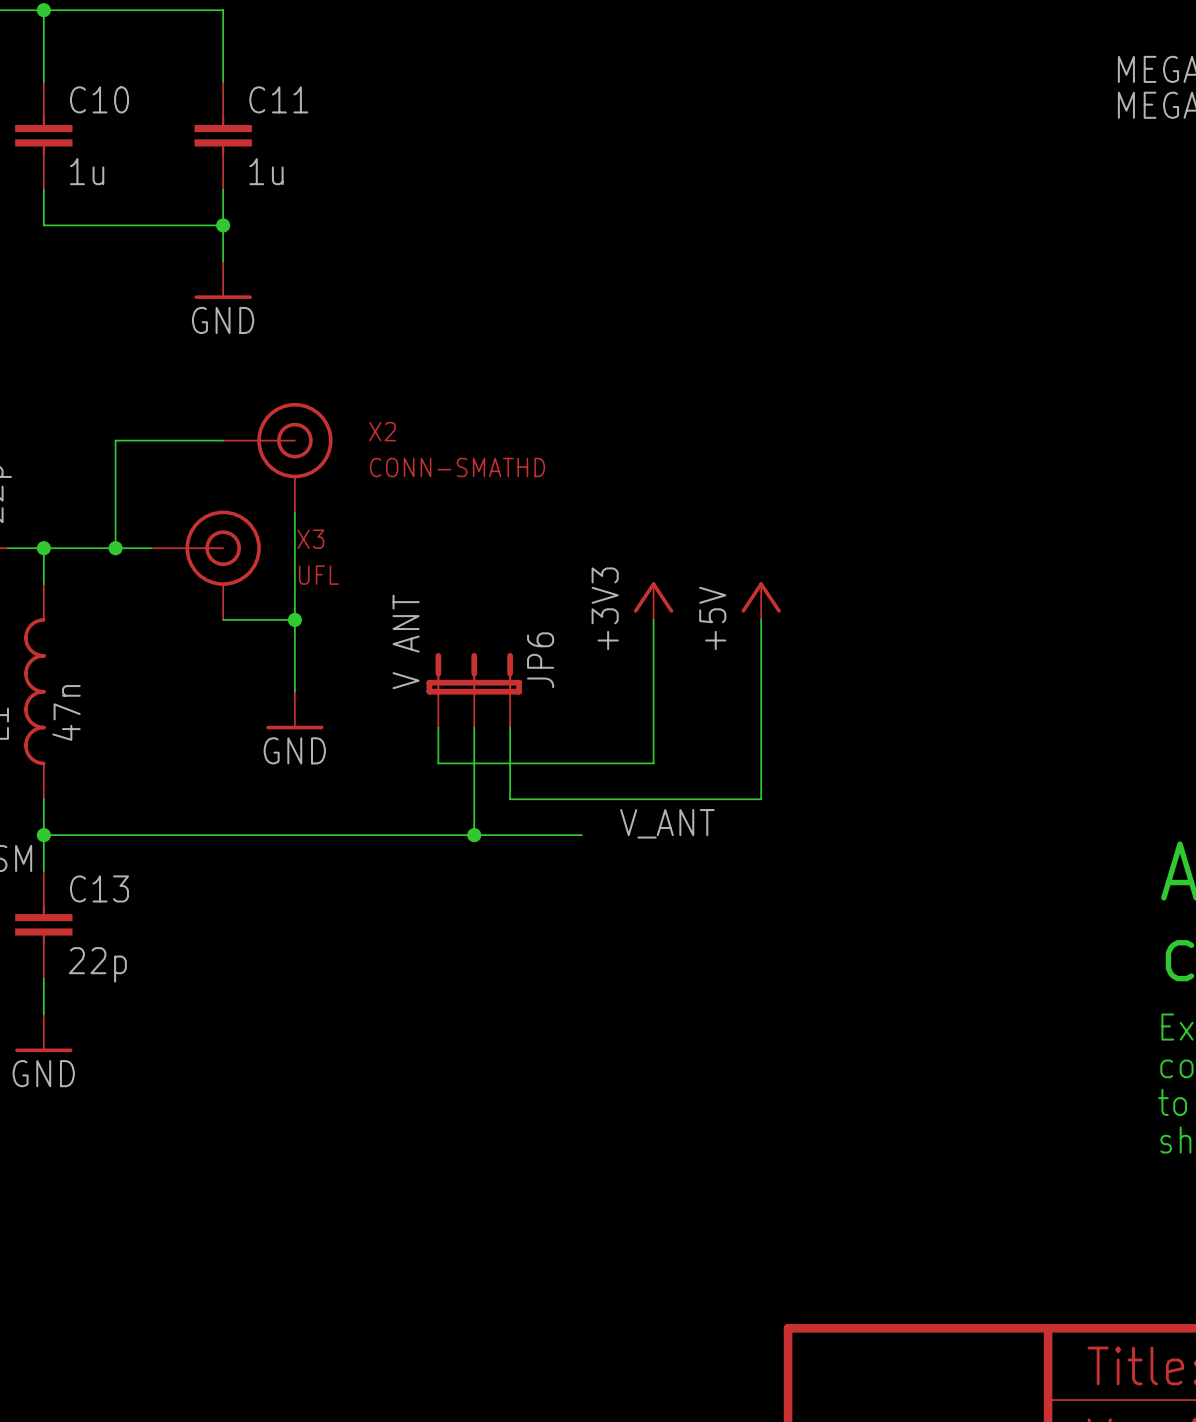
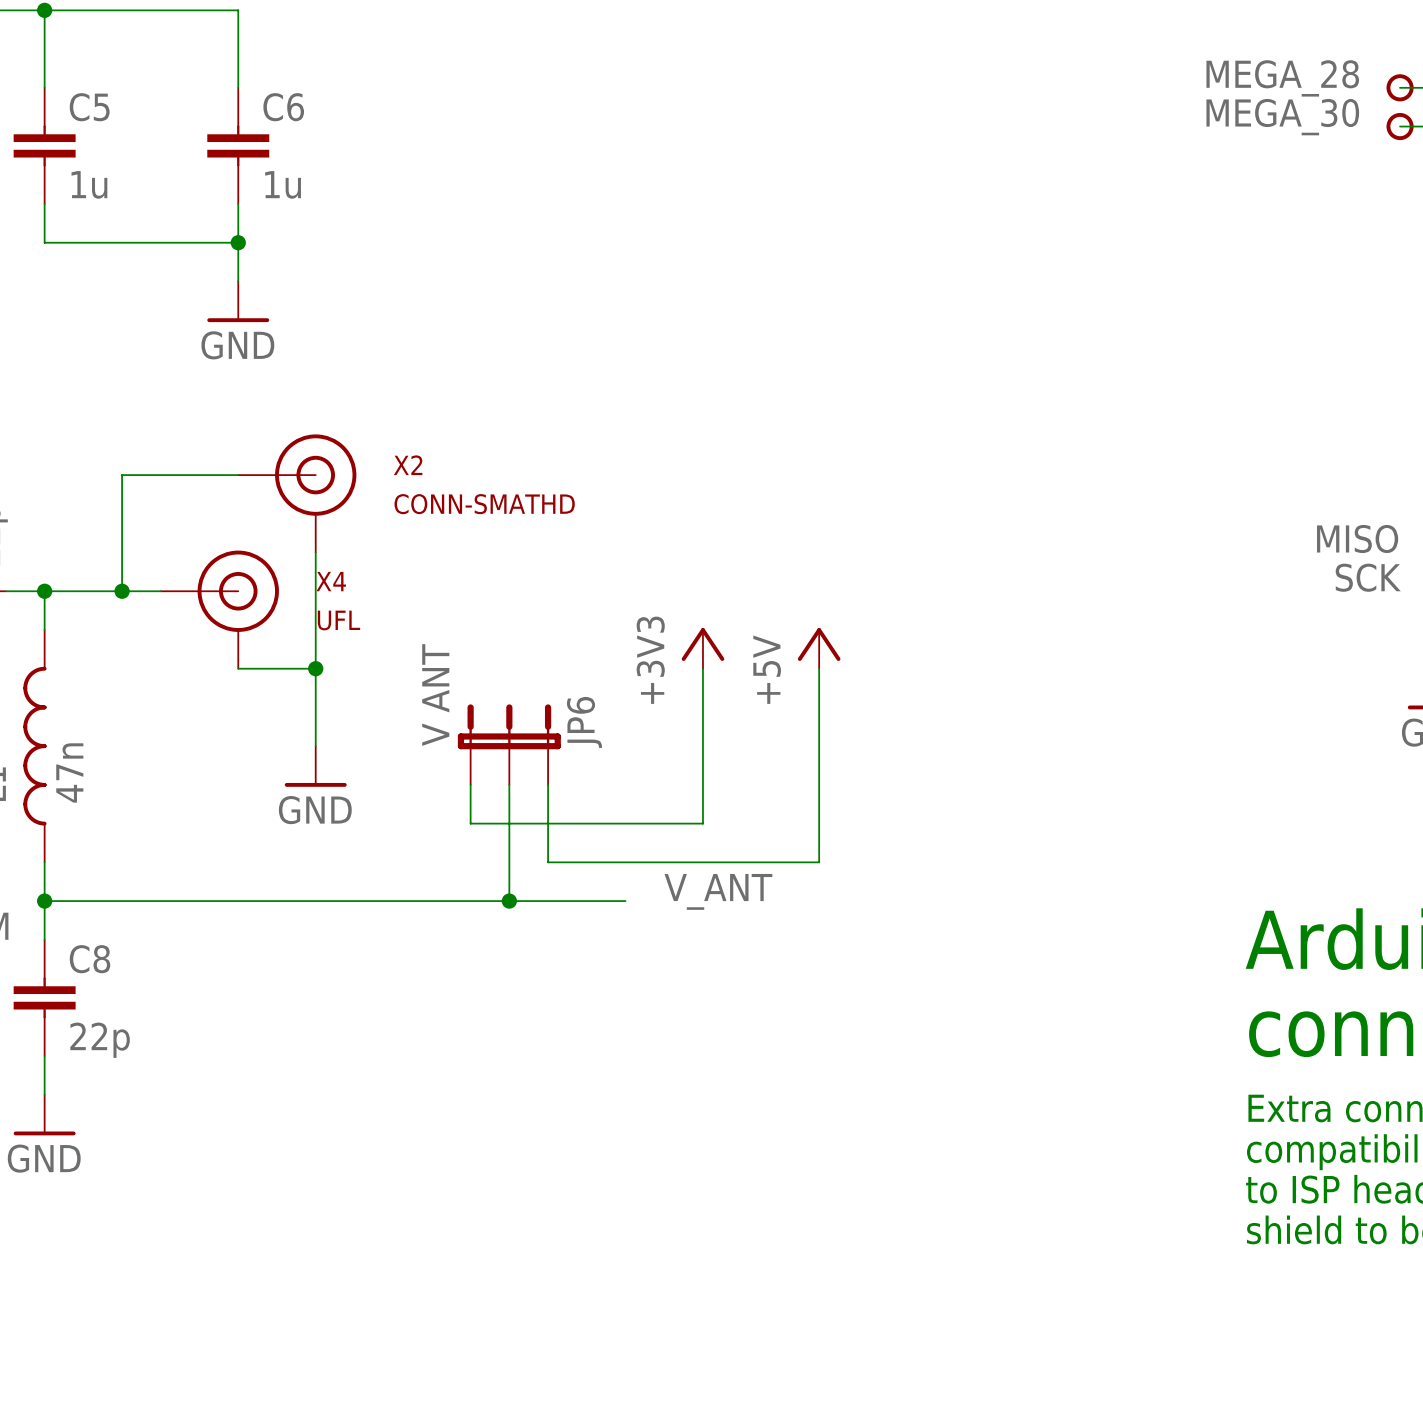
C10 name: C10 (99, 99) -> C5 (89, 107)
C11 name: C11 (278, 99) -> C6 (283, 107)
X3 name: X3 (310, 539) -> X4 (331, 581)
C13 name: C13 (99, 888) -> C8 (89, 959)

